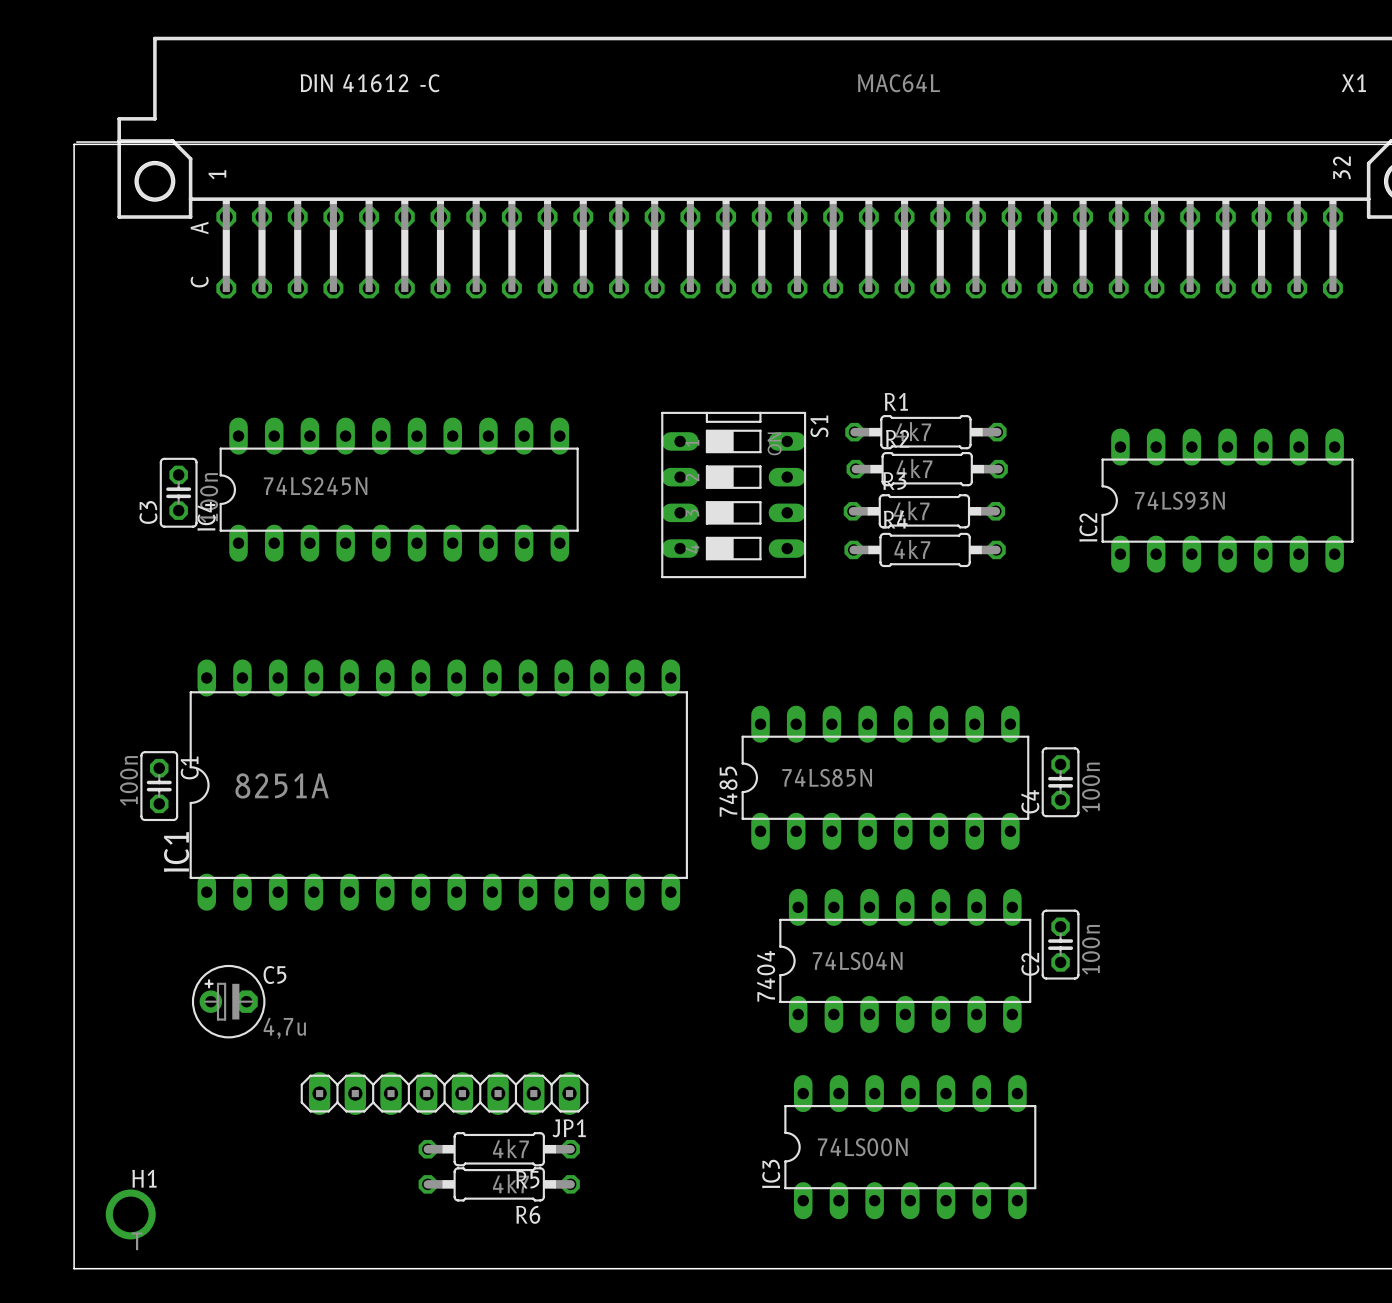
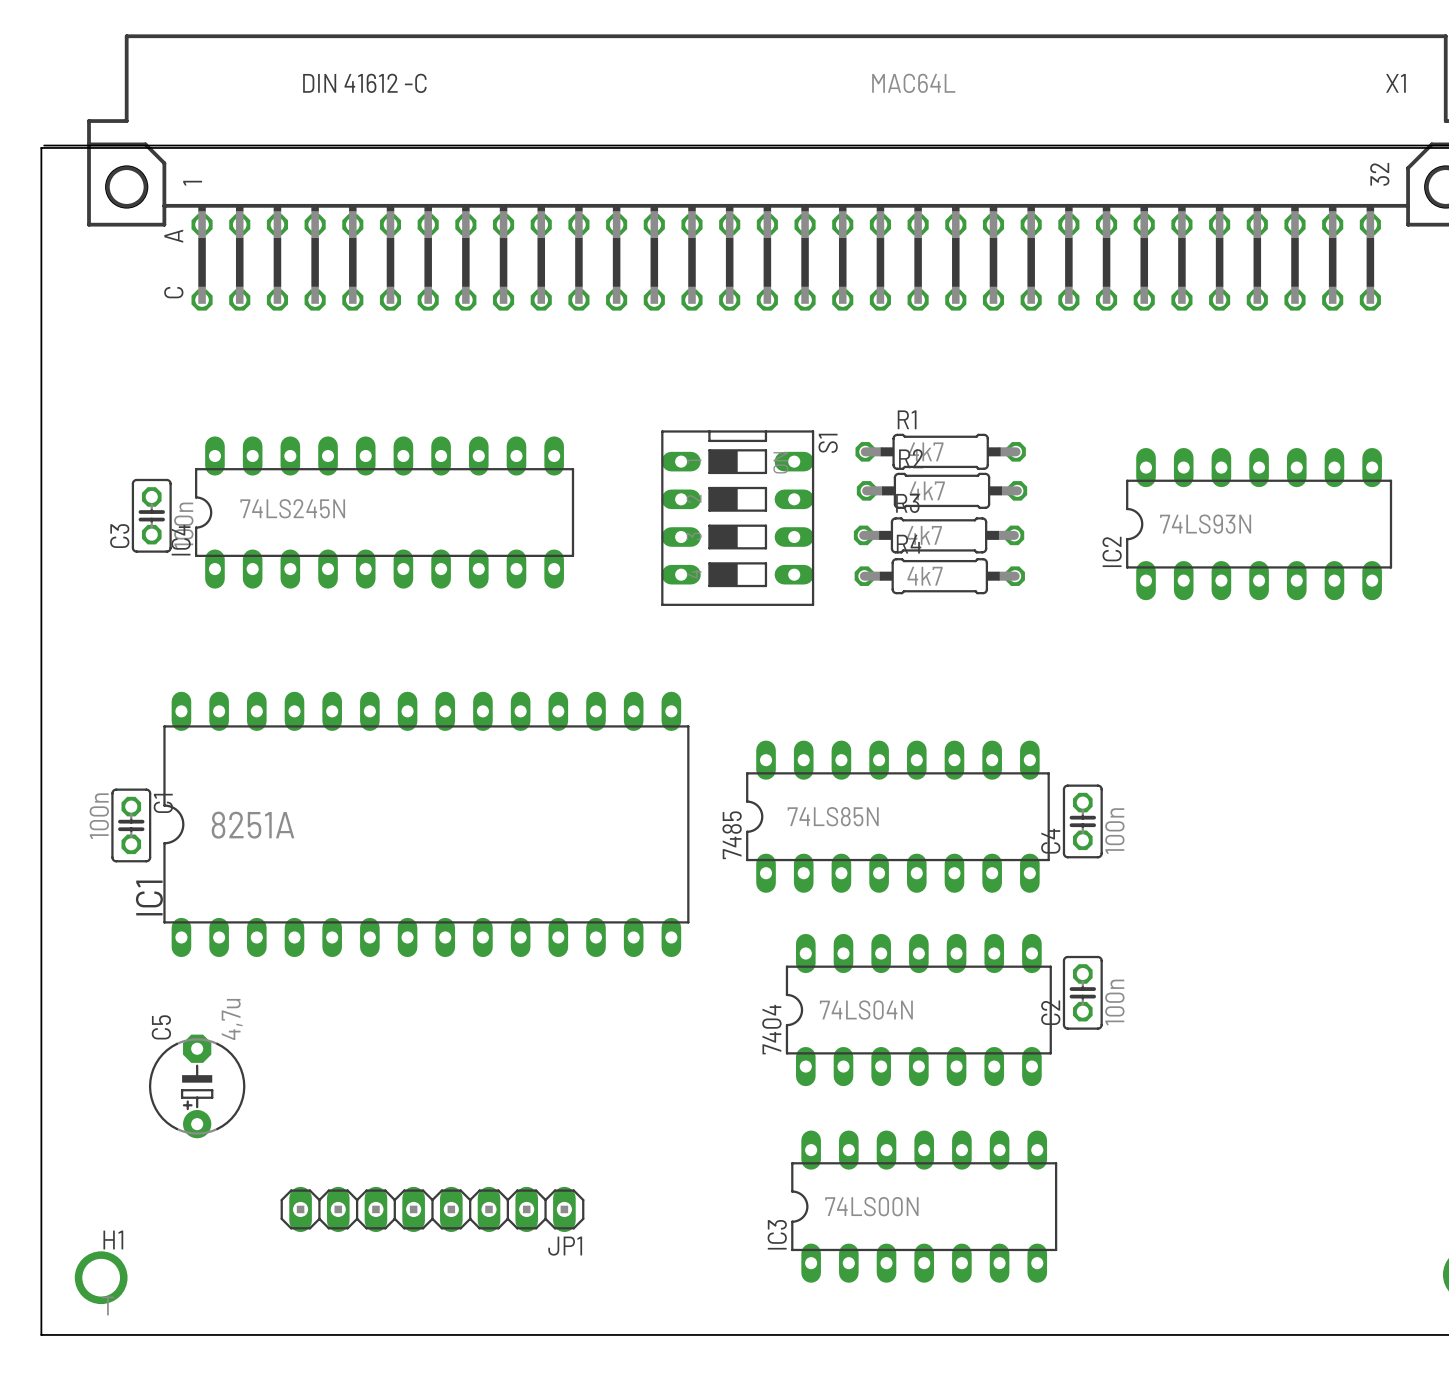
C5 footprint: [191, 964, 266, 1039] -> [148, 1034, 246, 1139]
C5 name position: C5 (274, 975) -> C5 (161, 1027)
C5 value position: 4,7u (284, 1028) -> 4,7u (232, 1019)
JP1 position: (444, 1093) -> (432, 1209)
R5: 4k7 (499, 1149) -> none
R6: 4k7 (499, 1184) -> none

